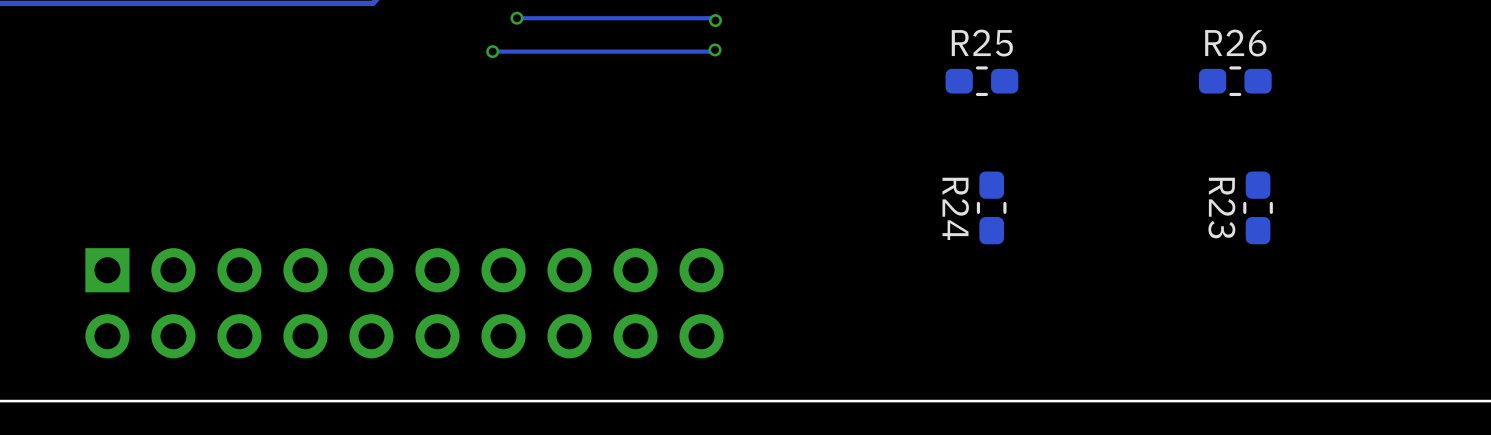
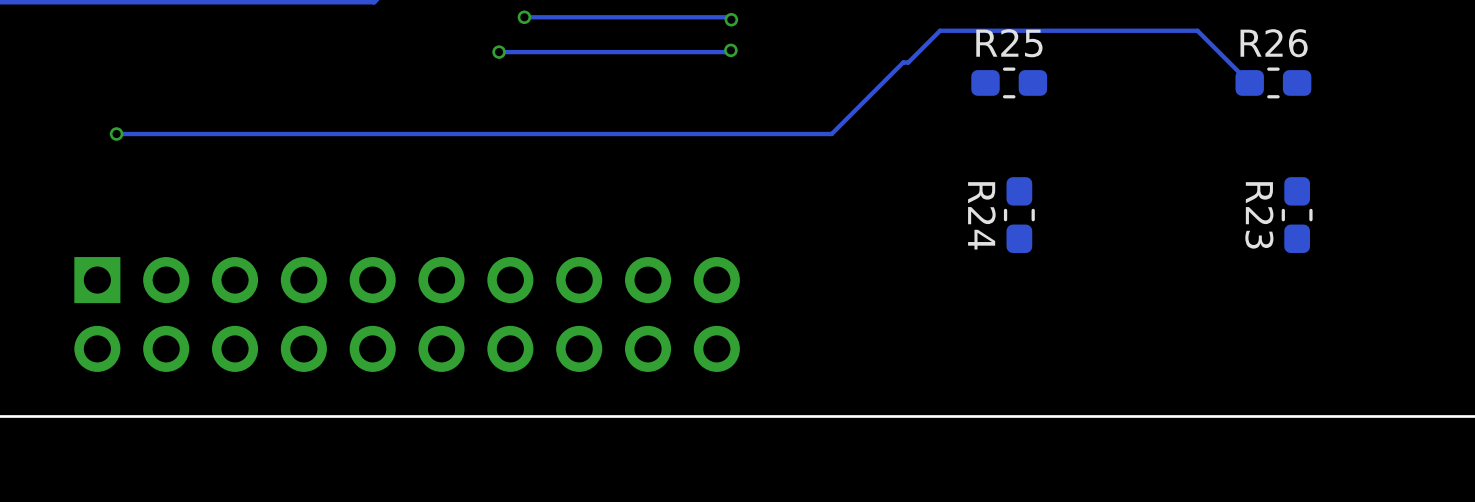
track: none -> (1249, 82) (1197, 30) (940, 30) (908, 62) (903, 62) (831, 134) (116, 134)
via: none -> (116, 134)

